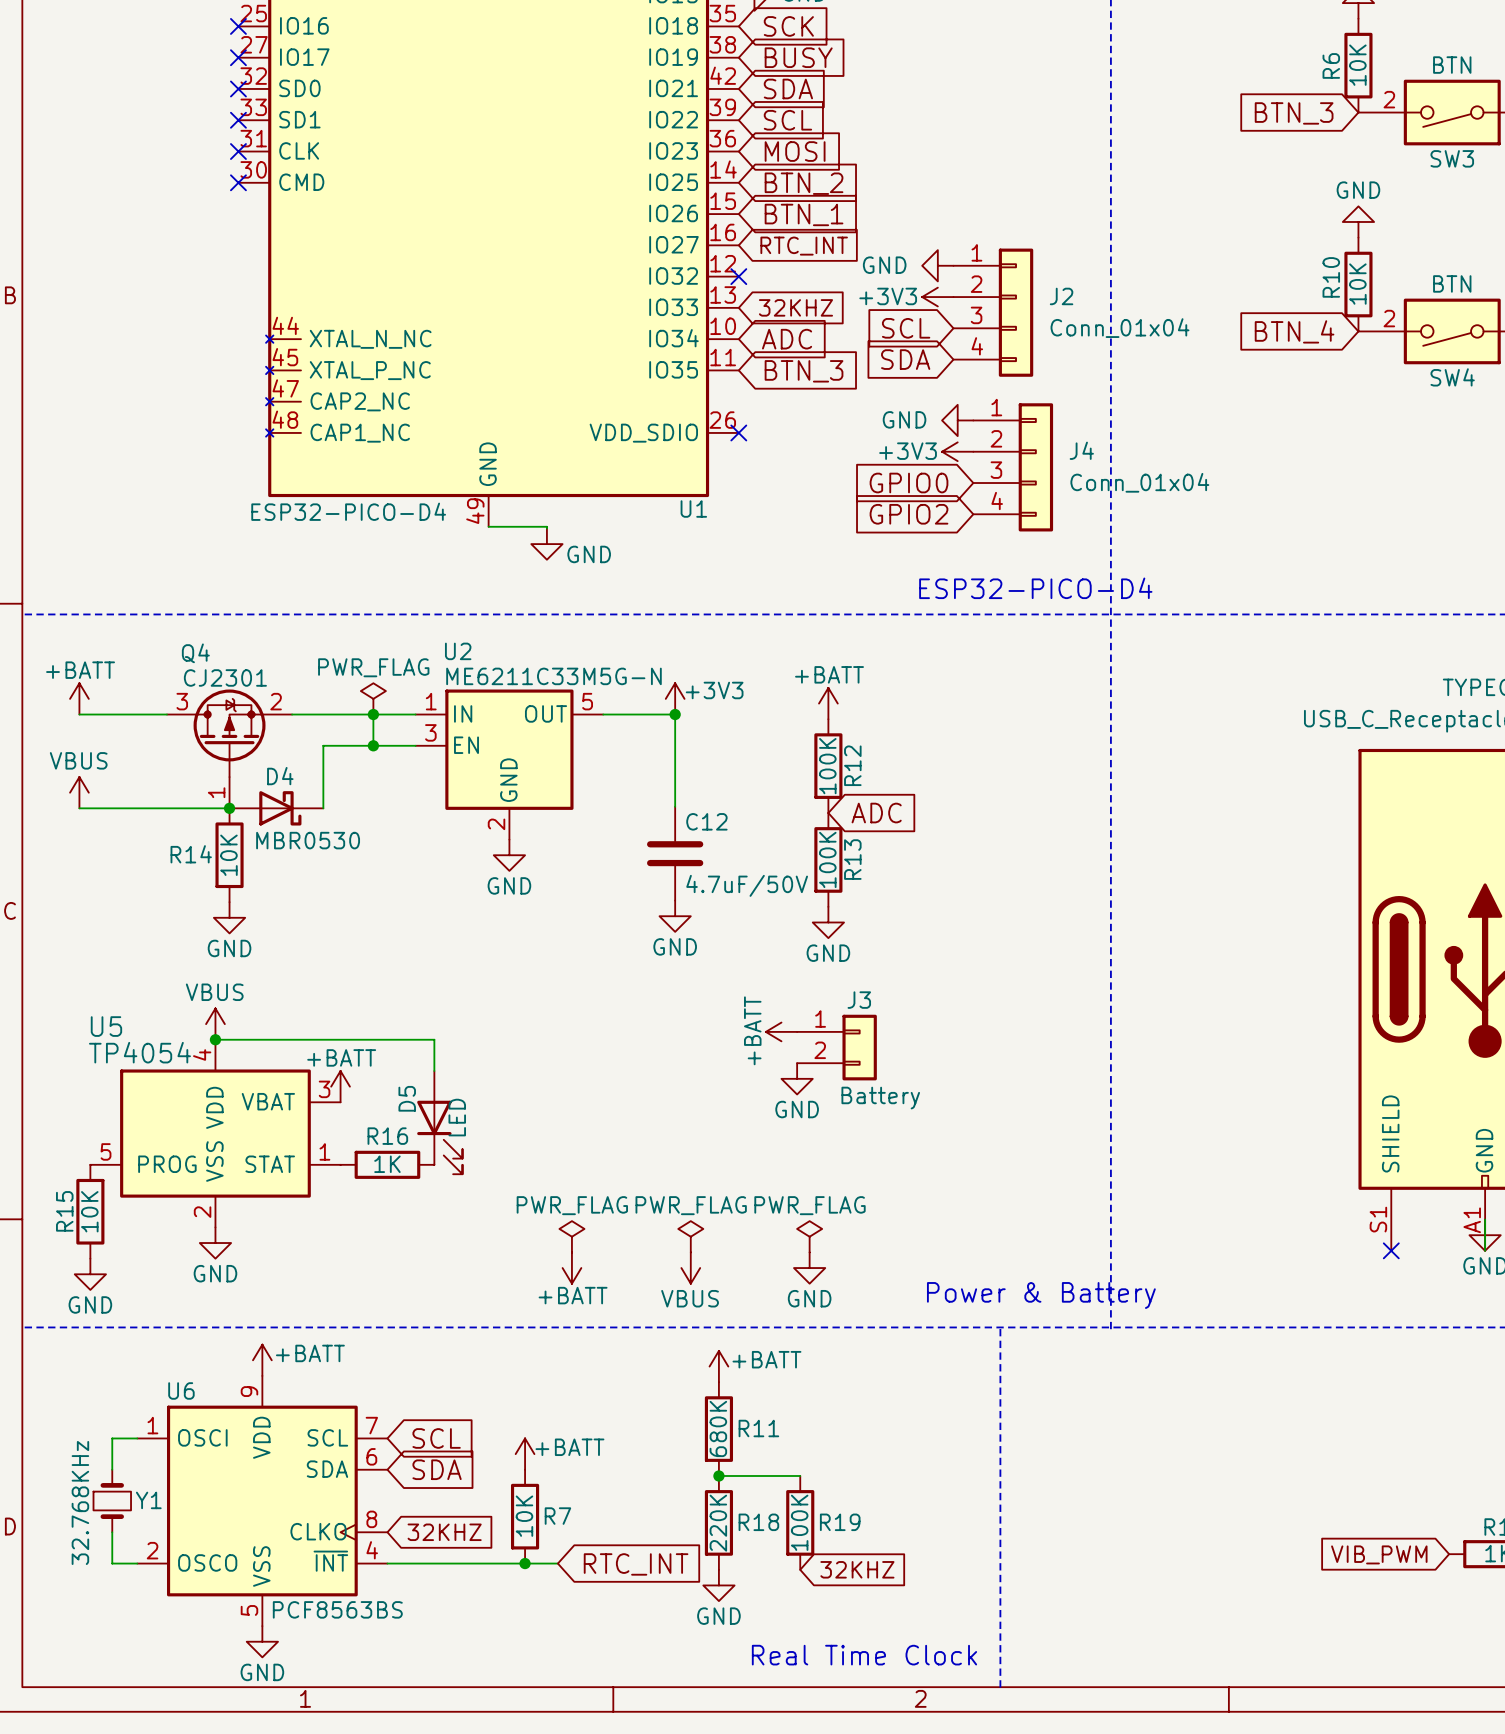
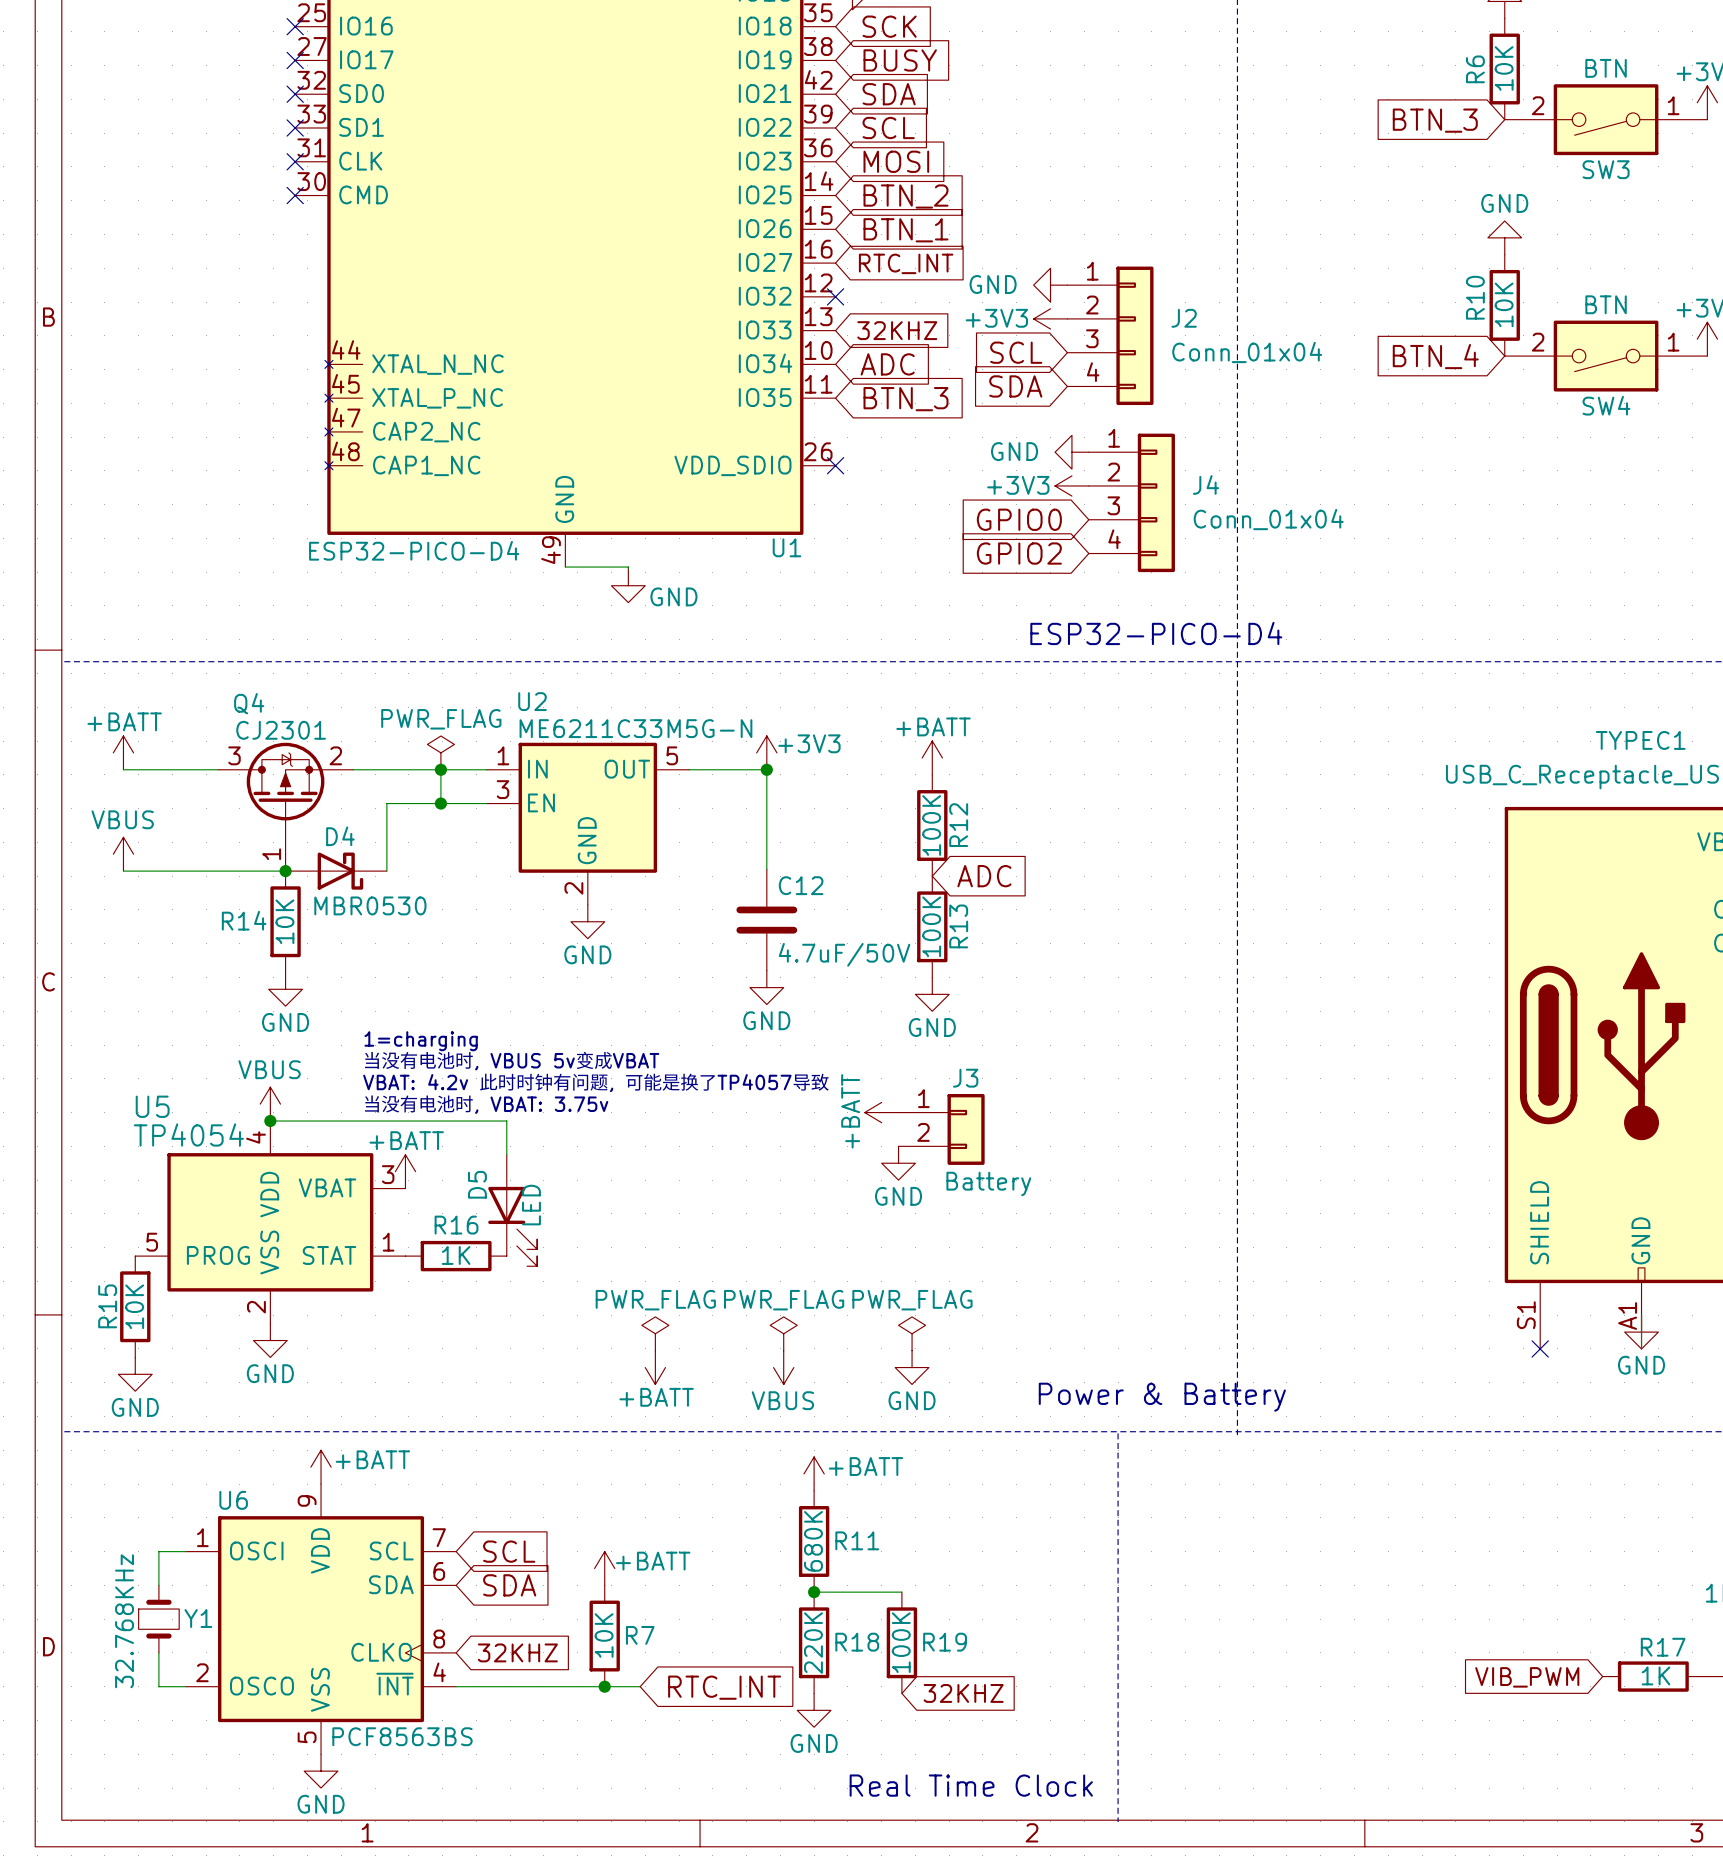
text: none -> 1=charging (421, 1041)
text: none -> 当没有电池时, VBUS 5v变成VBAT (511, 1060)
text: none -> VBAT: 4.2v 此时时钟有问题, 可能是换了TP4057导致 (596, 1082)
text: none -> 当没有电池时, VBAT: 3.75v (486, 1104)

